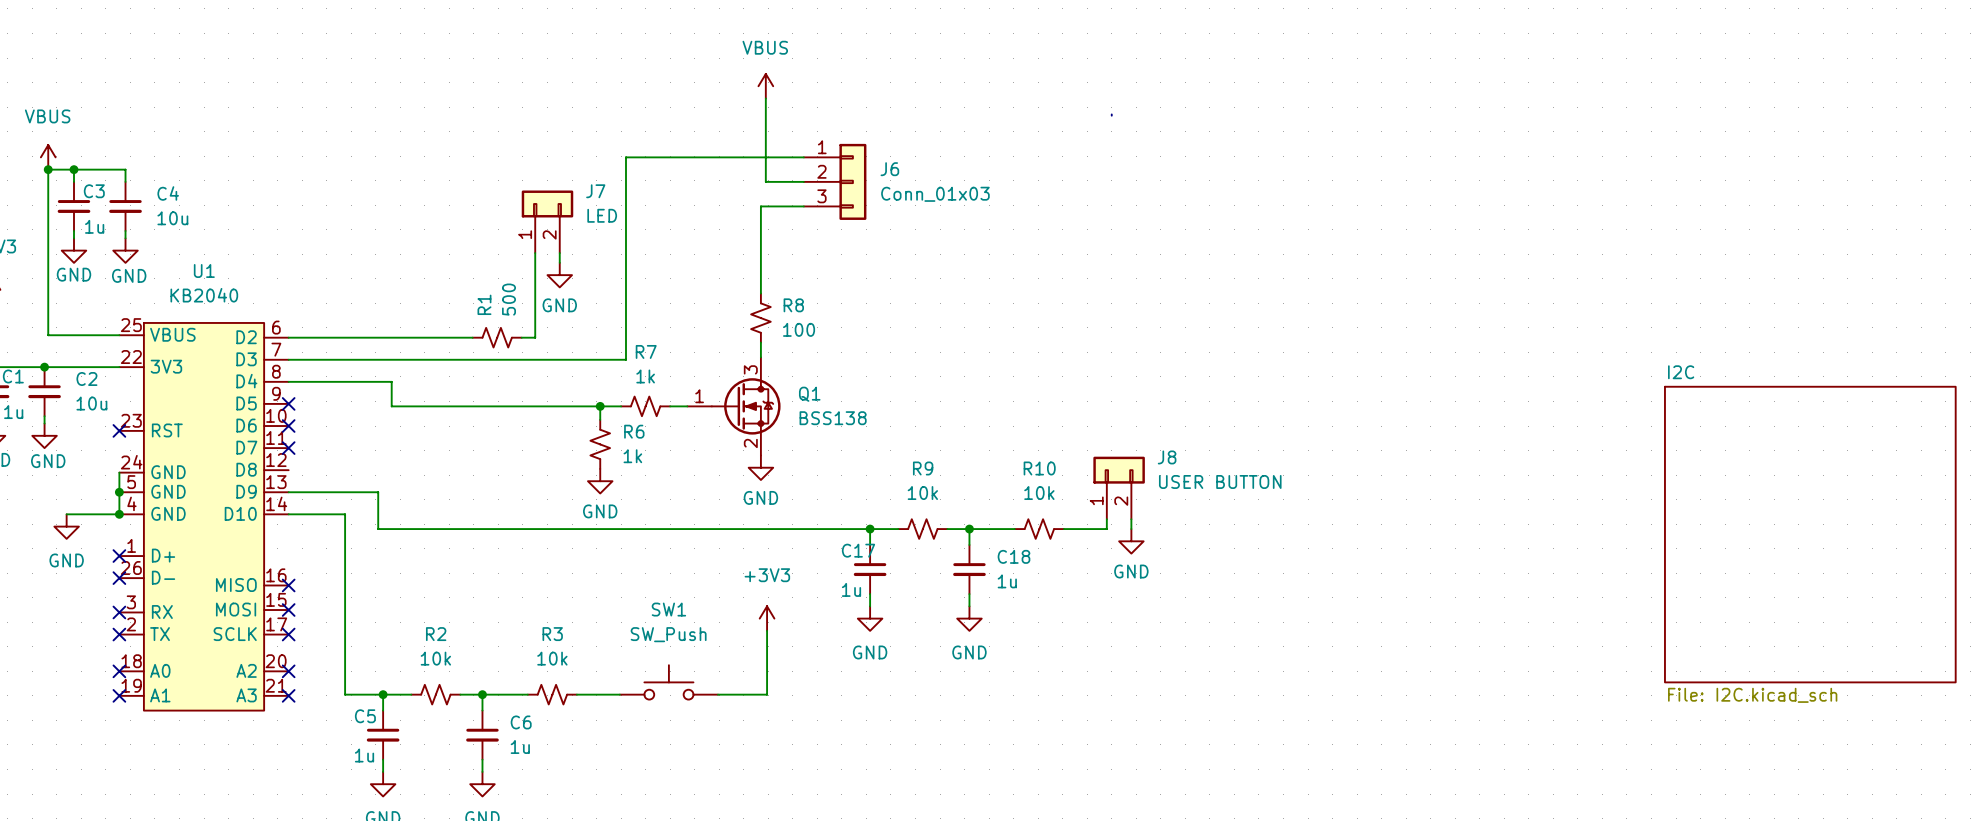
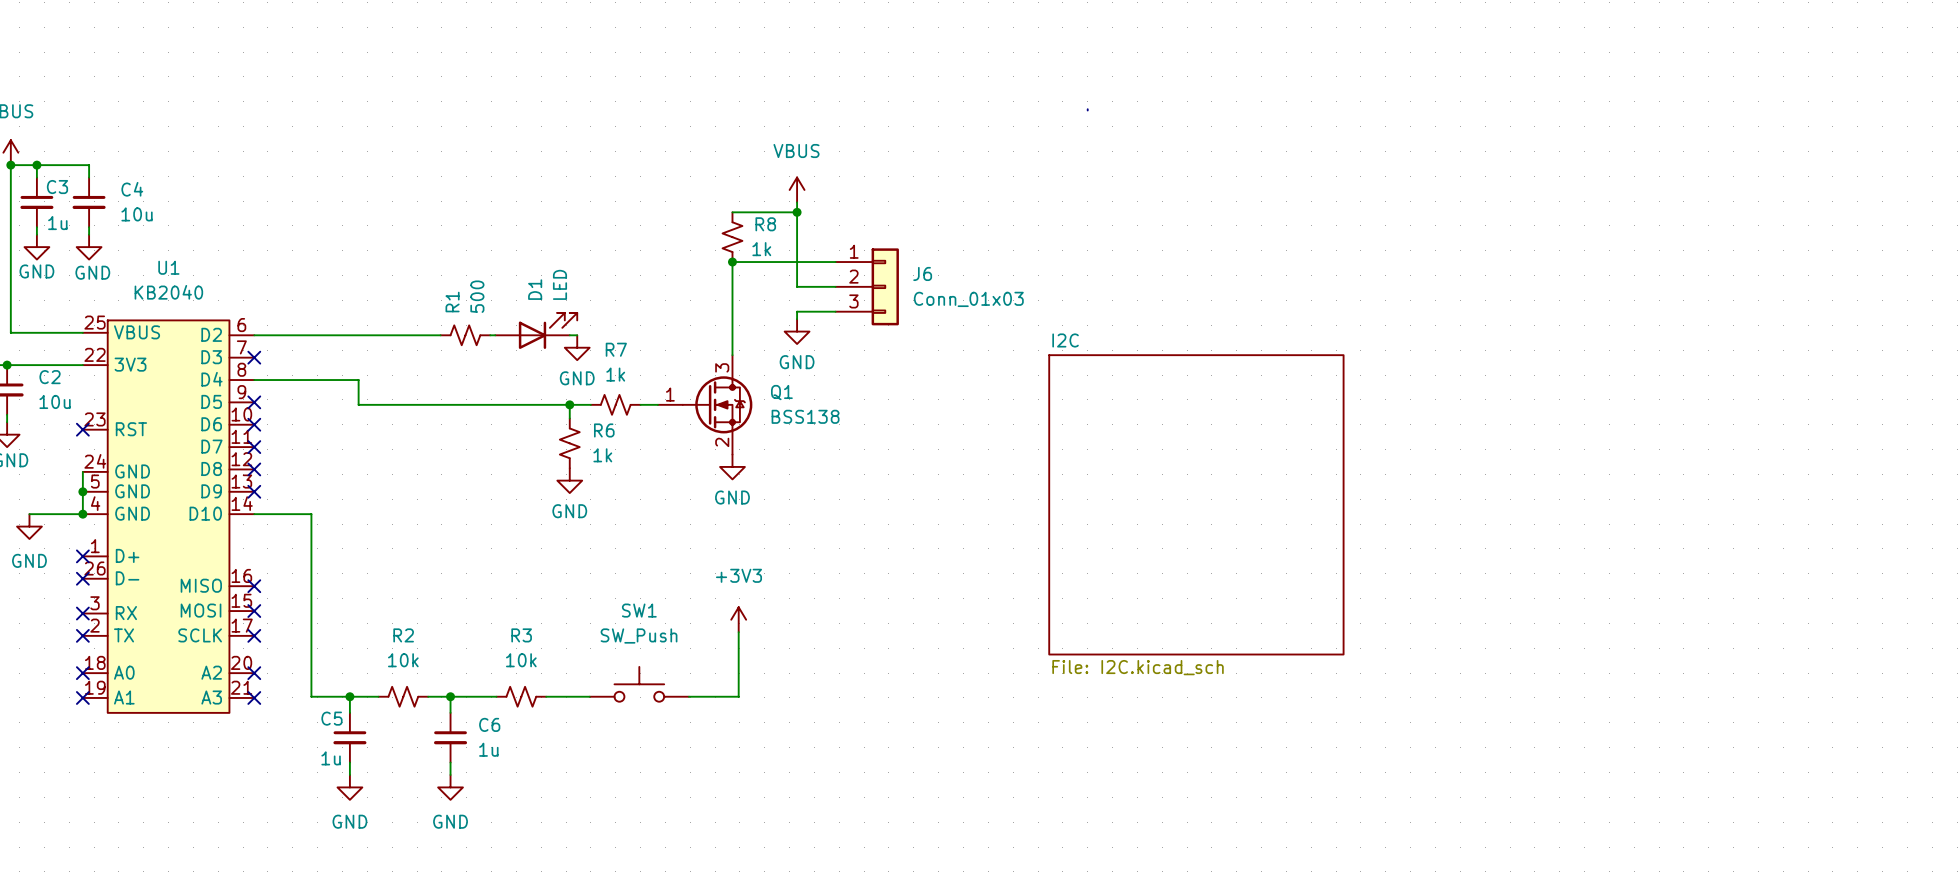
power symbol position: VBUS (765, 86) -> VBUS (797, 189)
wire: (765, 98) (765, 181) (803, 181) -> (797, 202) (797, 286) (835, 286)
wire: (803, 157) (625, 157) (625, 359) (288, 359) -> none
J6 position: (835, 181) -> (867, 286)
wire: (803, 206) (760, 206) (760, 265) -> (835, 262) (732, 262)
wire: none -> (732, 212) (797, 212)
junction: none -> (797, 212)
J7: LED (547, 221) -> none
wire: (535, 253) (535, 337) (526, 337) -> none
wire: (559, 253) (559, 262) -> none
junction: none -> (732, 262)
power symbol position: GND (559, 275) -> GND (577, 347)
wire: none -> (835, 311) (797, 311) (797, 319)
R8 position: (760, 318) -> (732, 237)
R8 value: 100 (799, 329) -> 1k (761, 249)
D1: none -> LED (536, 330)
power symbol: none -> GND (797, 331)
wire: none -> (569, 335) (577, 335)
no-connect mark: none -> (254, 357)
no-connect mark: none -> (254, 469)
J8: USER BUTTON (1119, 487) -> none
wire: (288, 492) (378, 492) (378, 529) (898, 529) -> none
no-connect mark: none -> (254, 491)
wire: (1106, 519) (1106, 529) (1063, 529) -> none
wire: (1131, 519) (1131, 529) -> none
wire: (870, 529) (870, 545) -> none
junction: (870, 529) -> none
R9: 10k (922, 529) -> none
wire: (947, 529) (1014, 529) -> none
wire: (969, 529) (969, 545) -> none
junction: (969, 529) -> none
R10: 10k (1039, 529) -> none
sheet I2C position: (1810, 534) -> (1196, 504)
power symbol: GND (1131, 541) -> none
C17: 1u (870, 569) -> none
C18: 1u (969, 569) -> none
wire: (870, 594) (870, 606) -> none
wire: (969, 594) (969, 606) -> none
power symbol: GND (870, 618) -> none
power symbol: GND (969, 618) -> none

